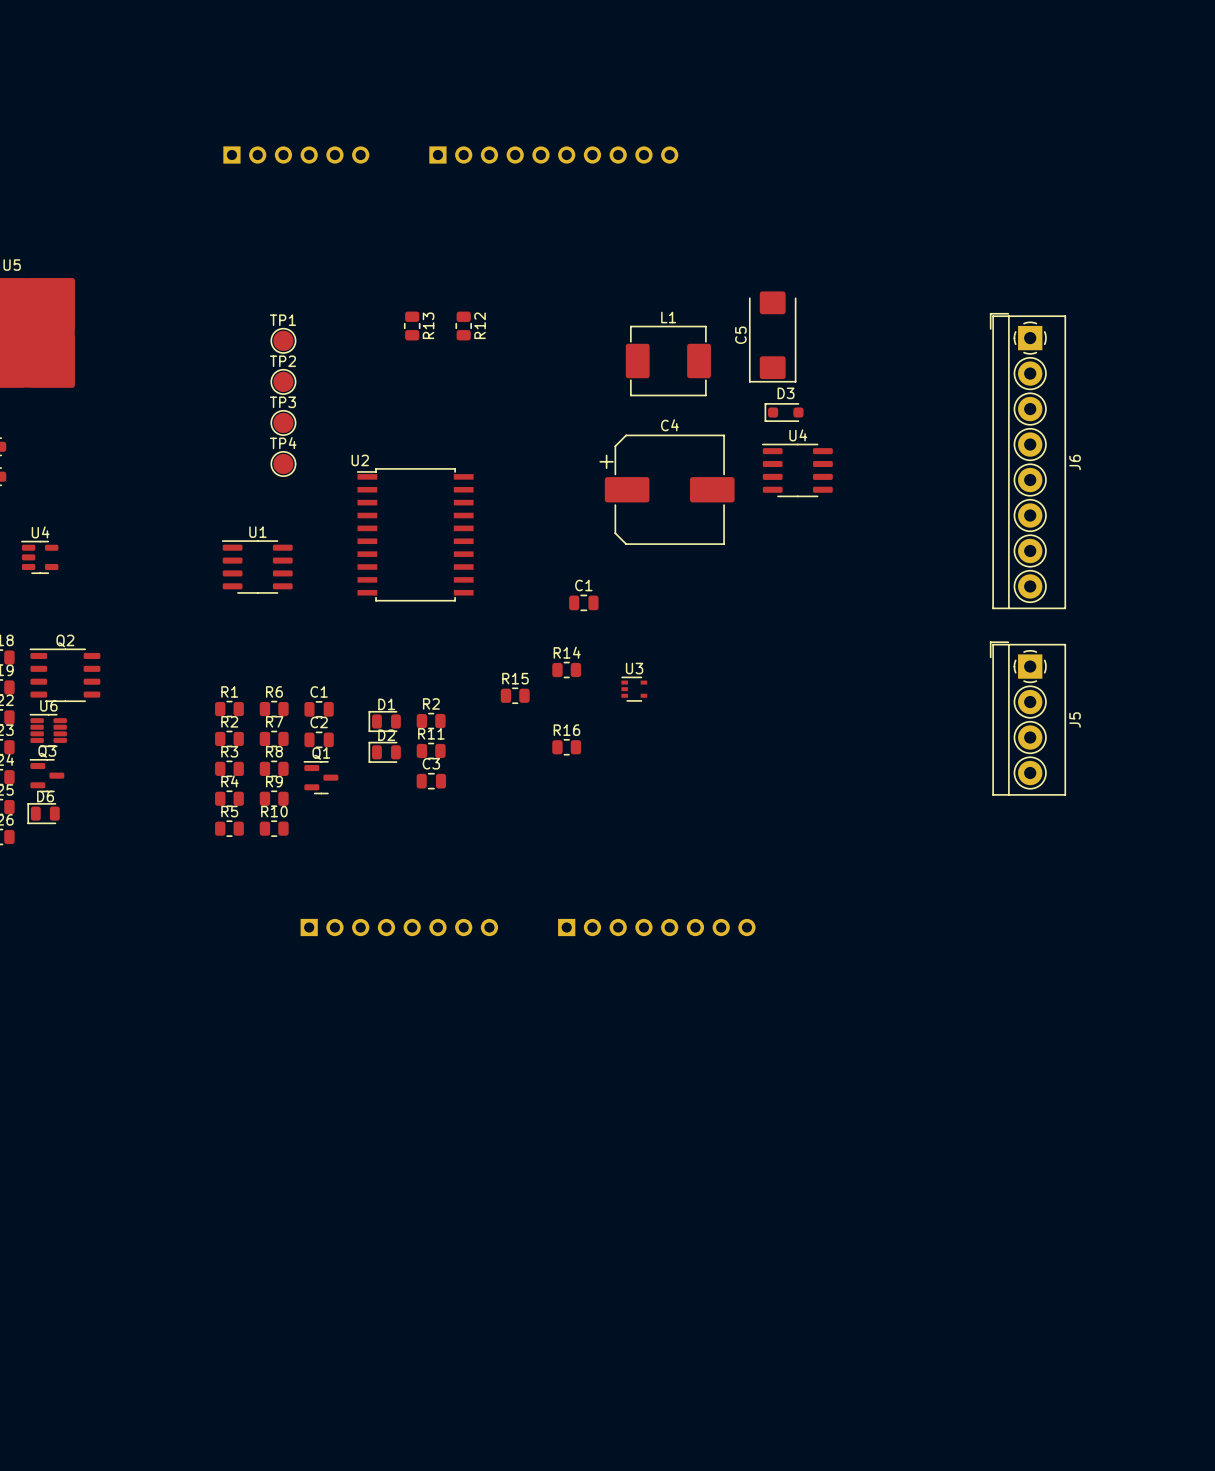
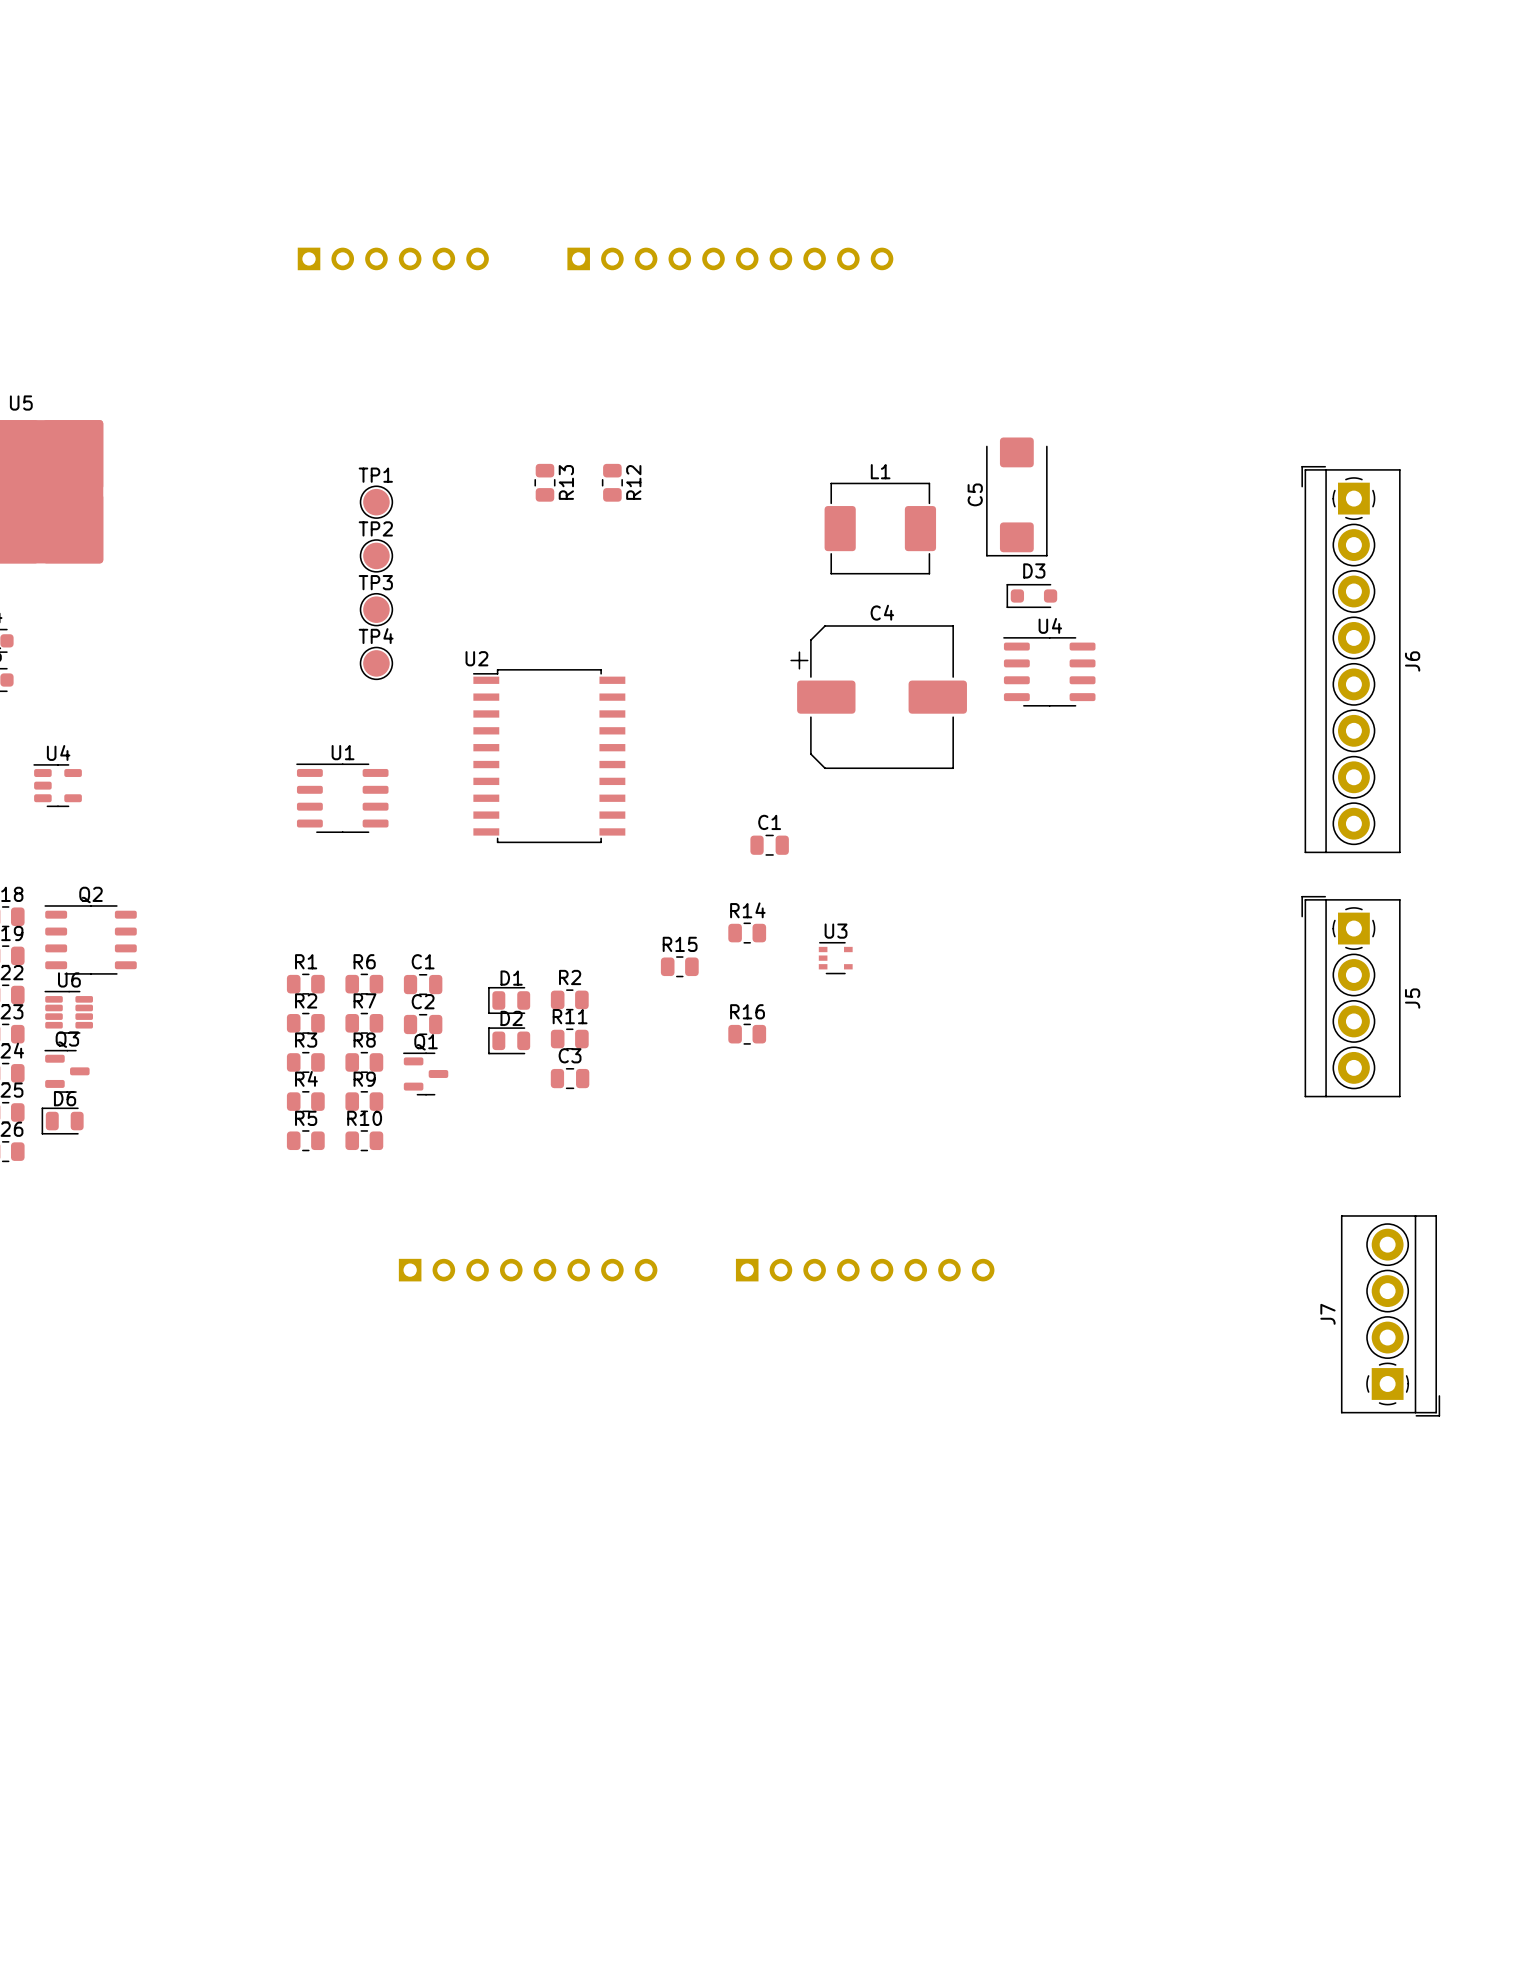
J7: none -> (1390, 1315)

